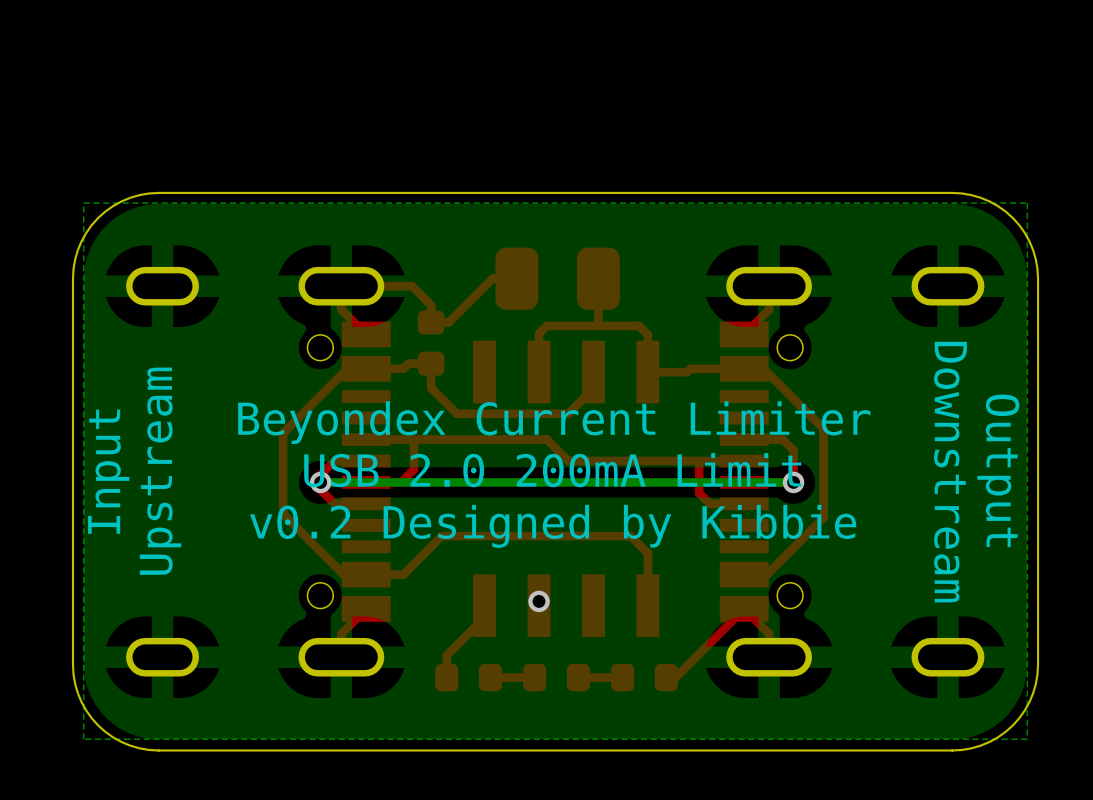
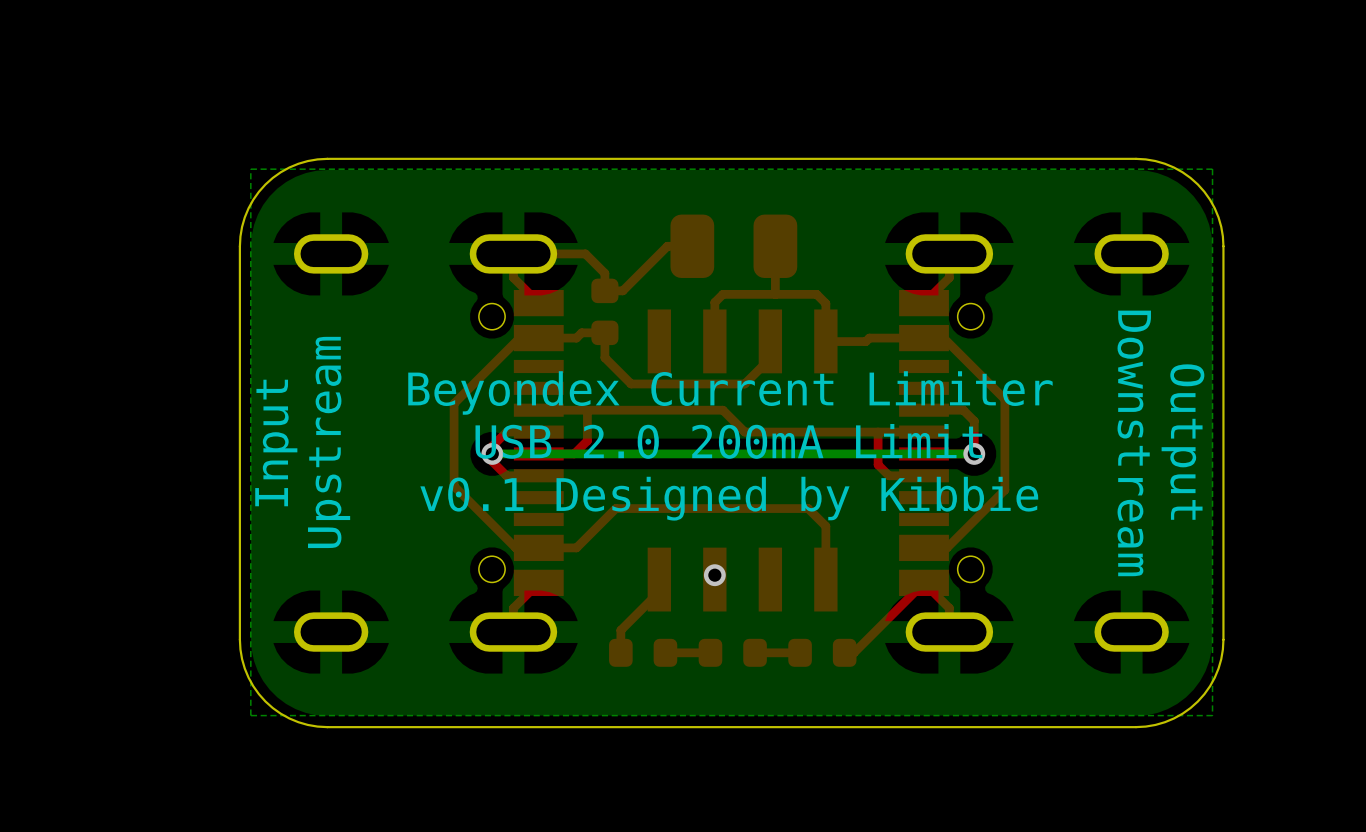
text: v0.2 Designed by Kibbie (553, 526) -> v0.1 Designed by Kibbie (729, 498)

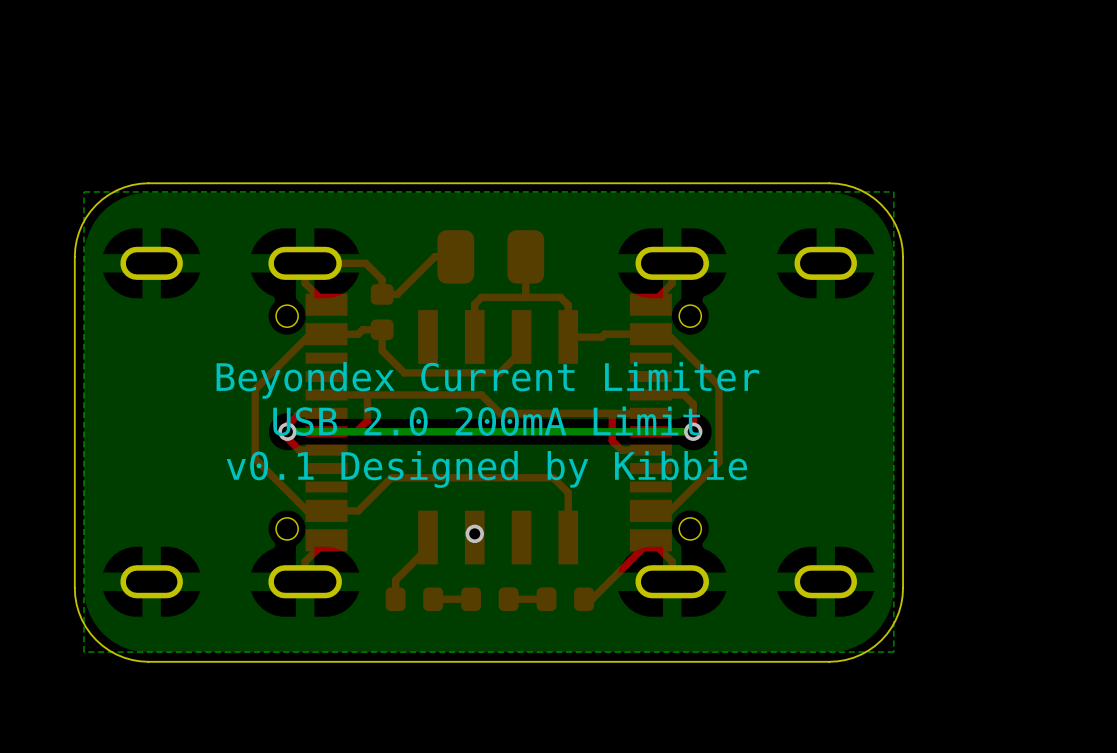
text: Input (276, 442) -> none
text: Upstream (329, 442) -> none
text: Output (1182, 442) -> none
text: Downstream (1134, 443) -> none

